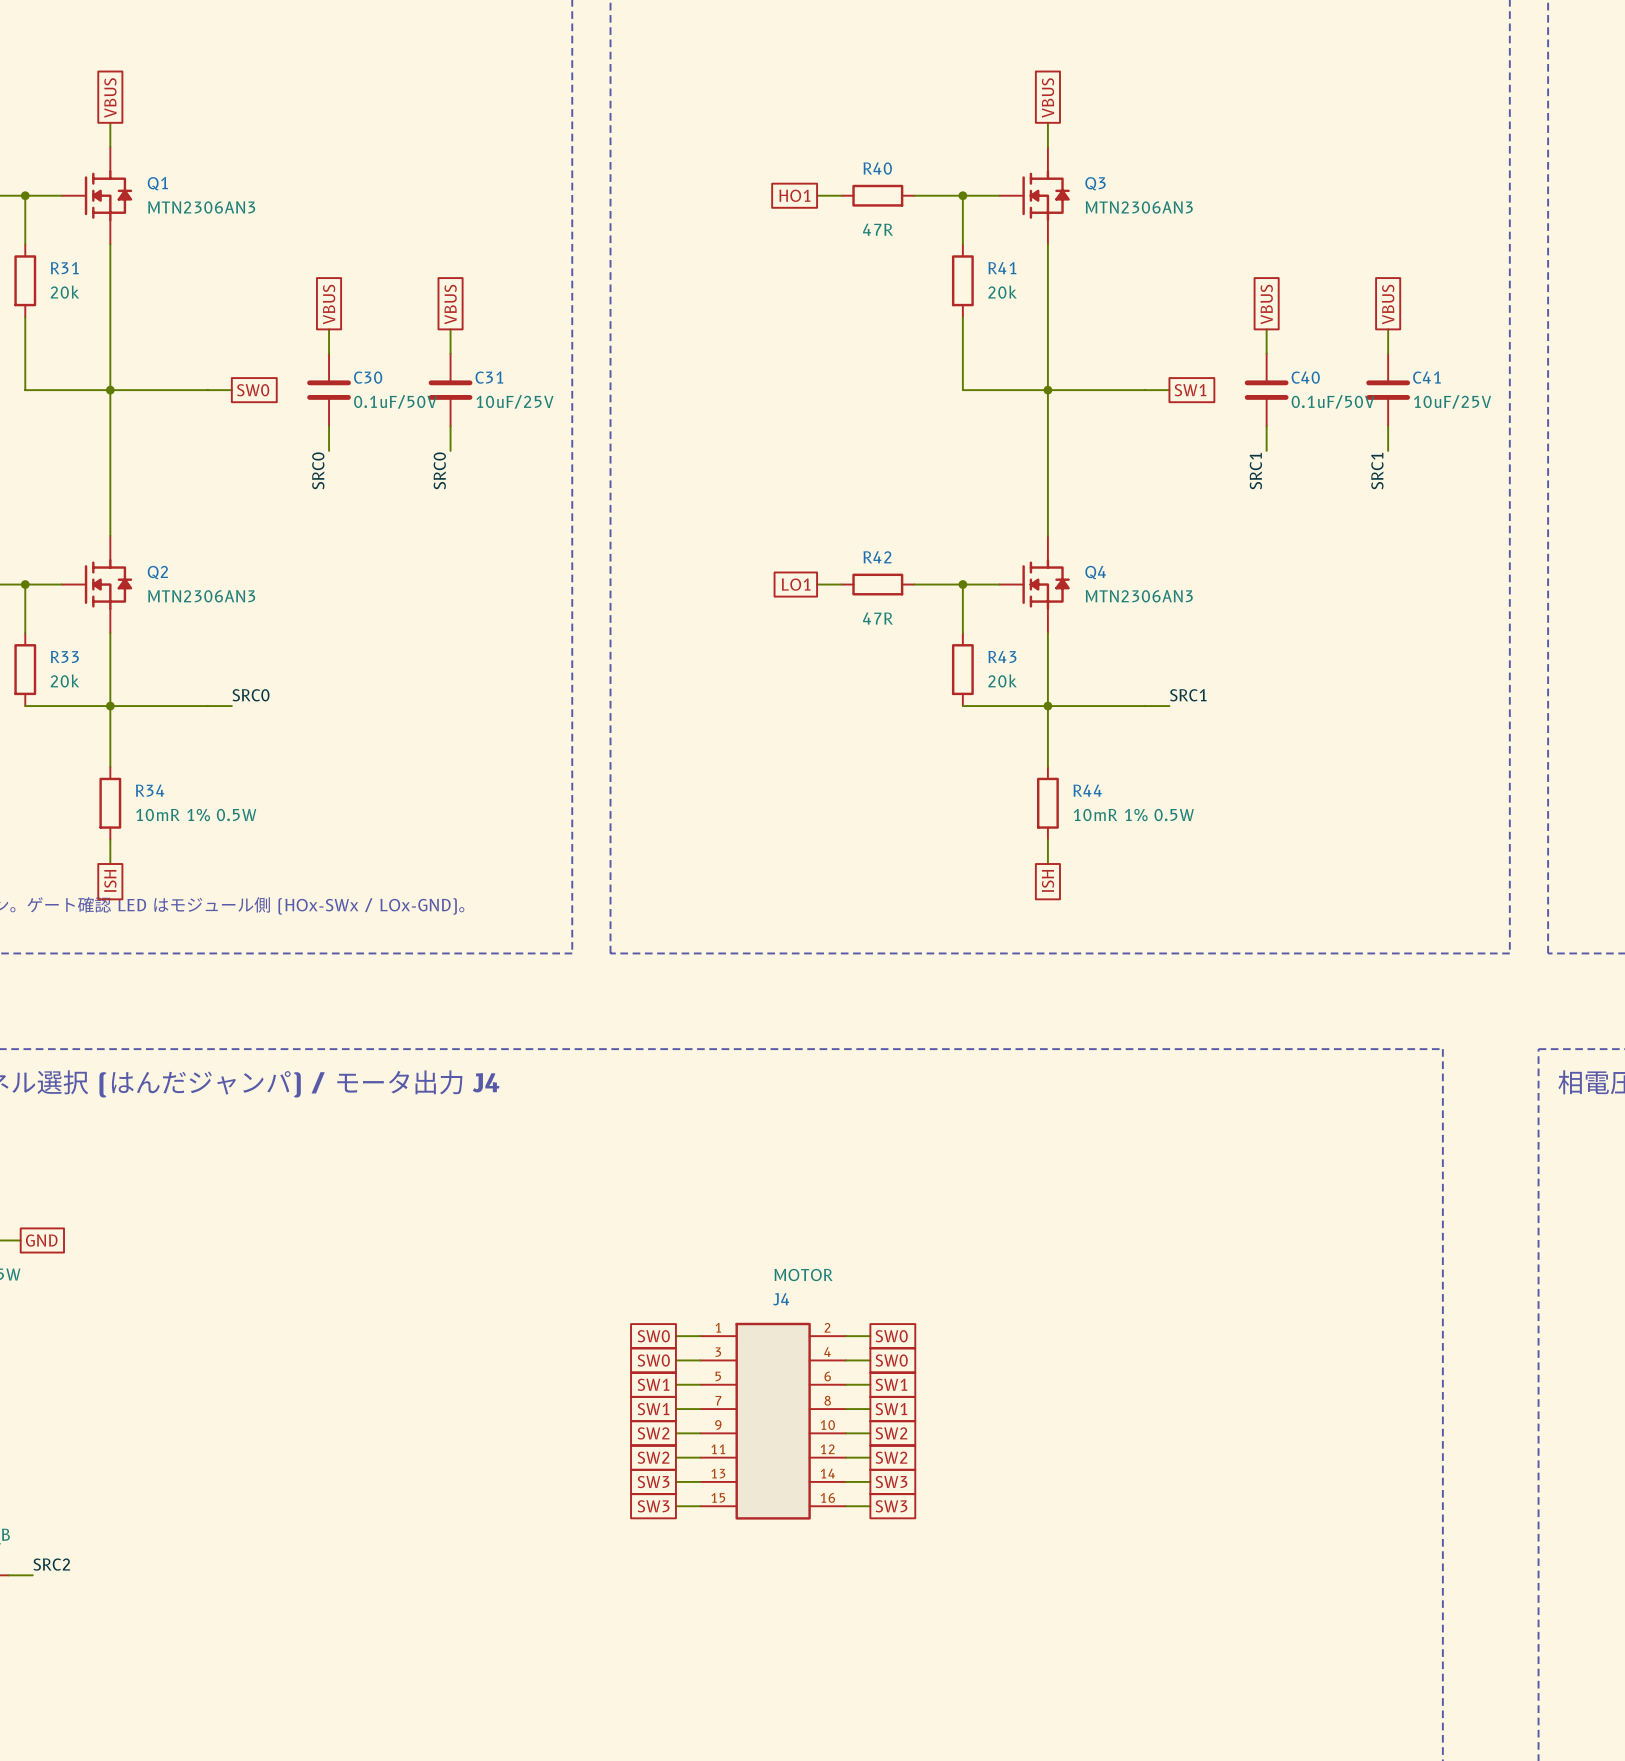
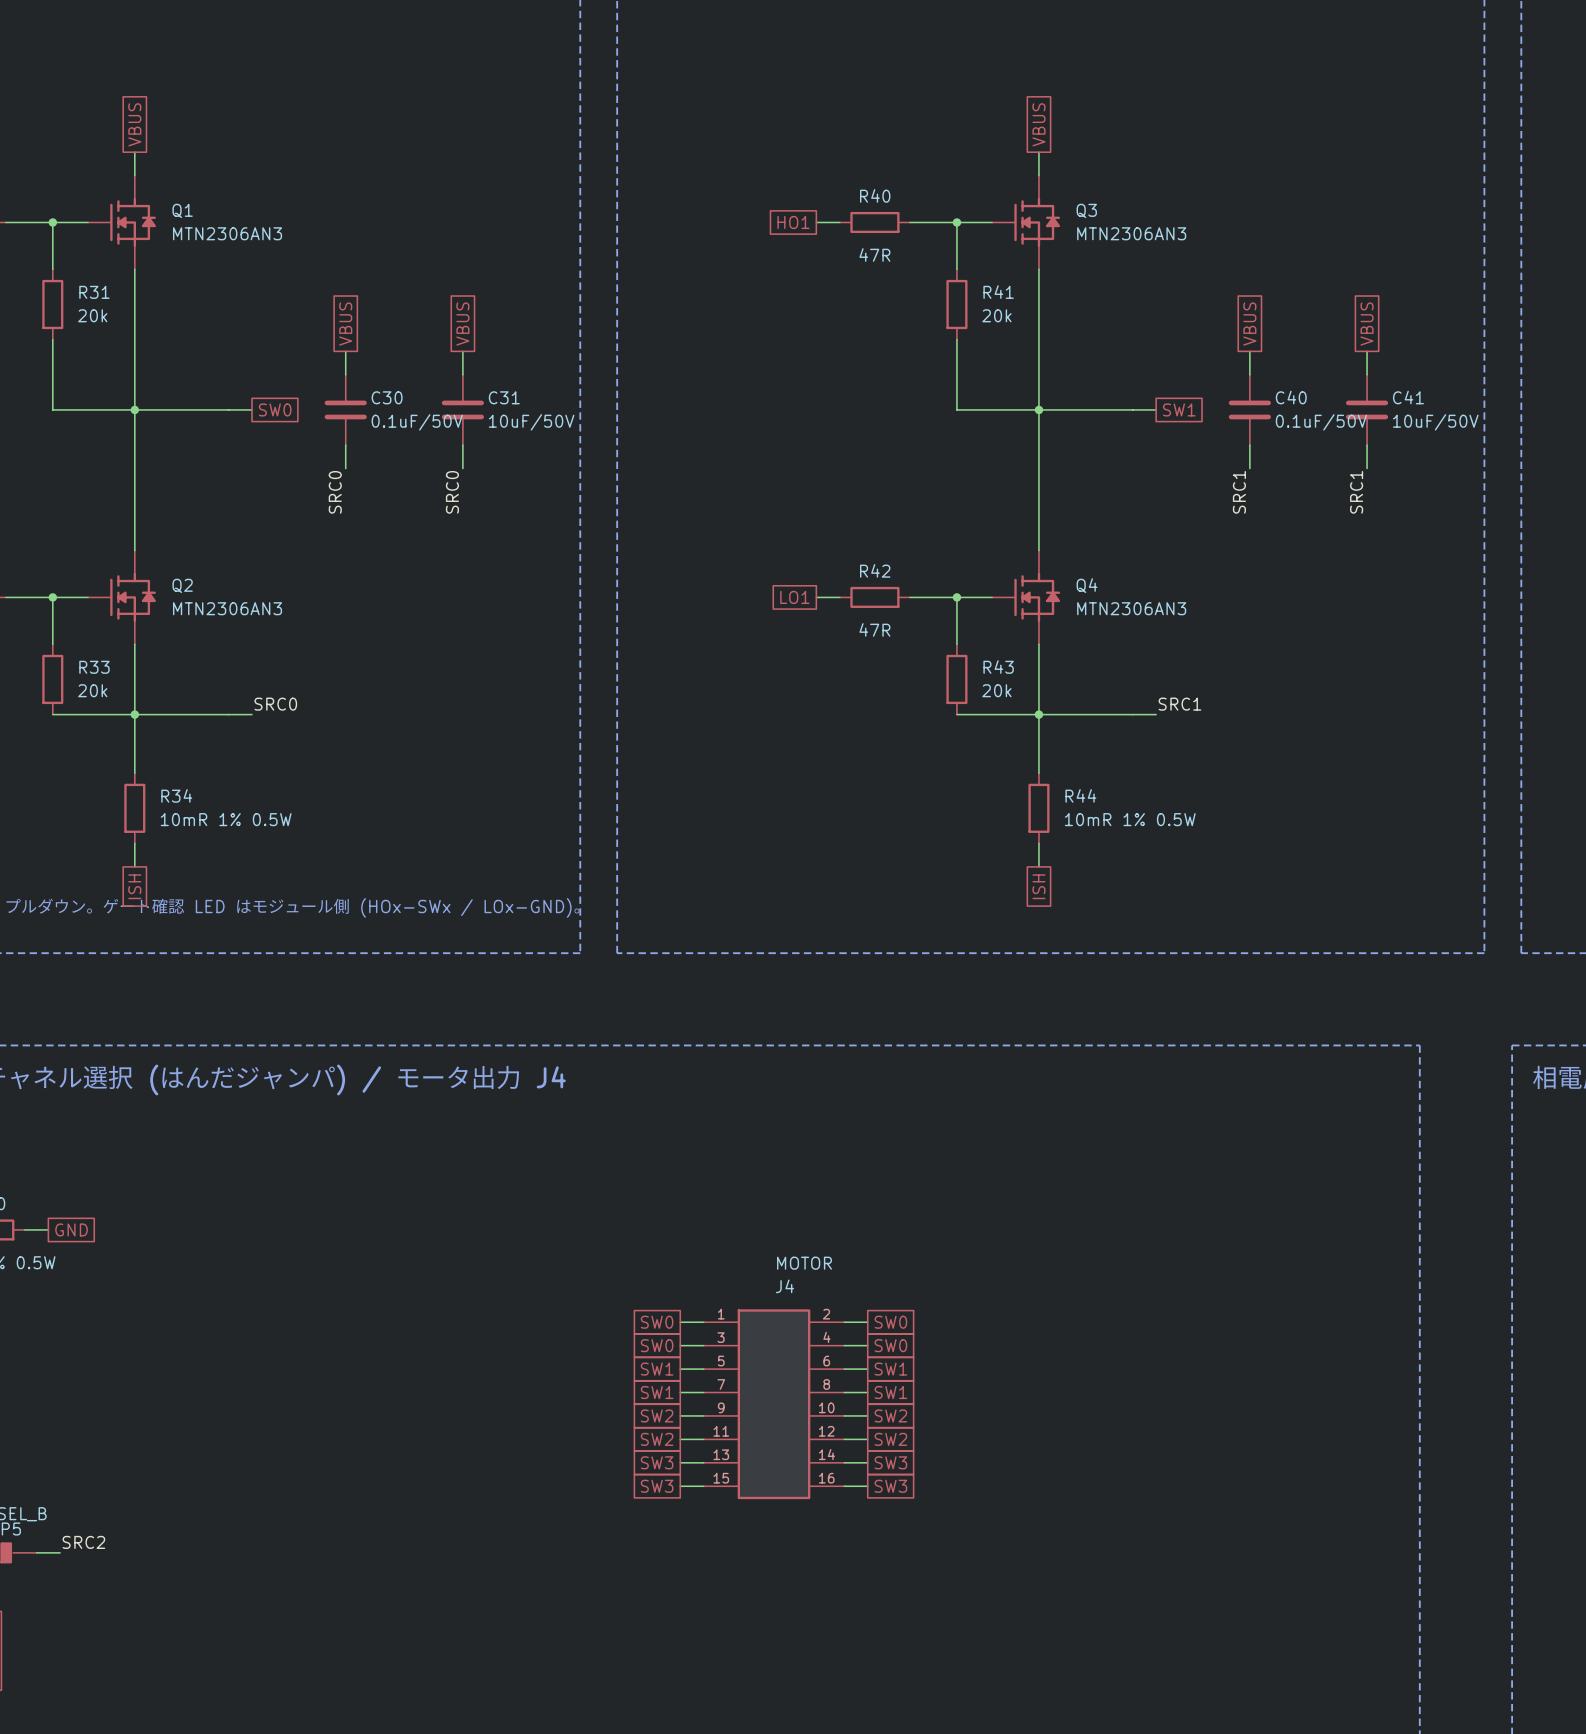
C31 value: 10uF/25V (514, 401) -> 10uF/50V (531, 422)
C41 value: 10uF/25V (1452, 401) -> 10uF/50V (1435, 422)

